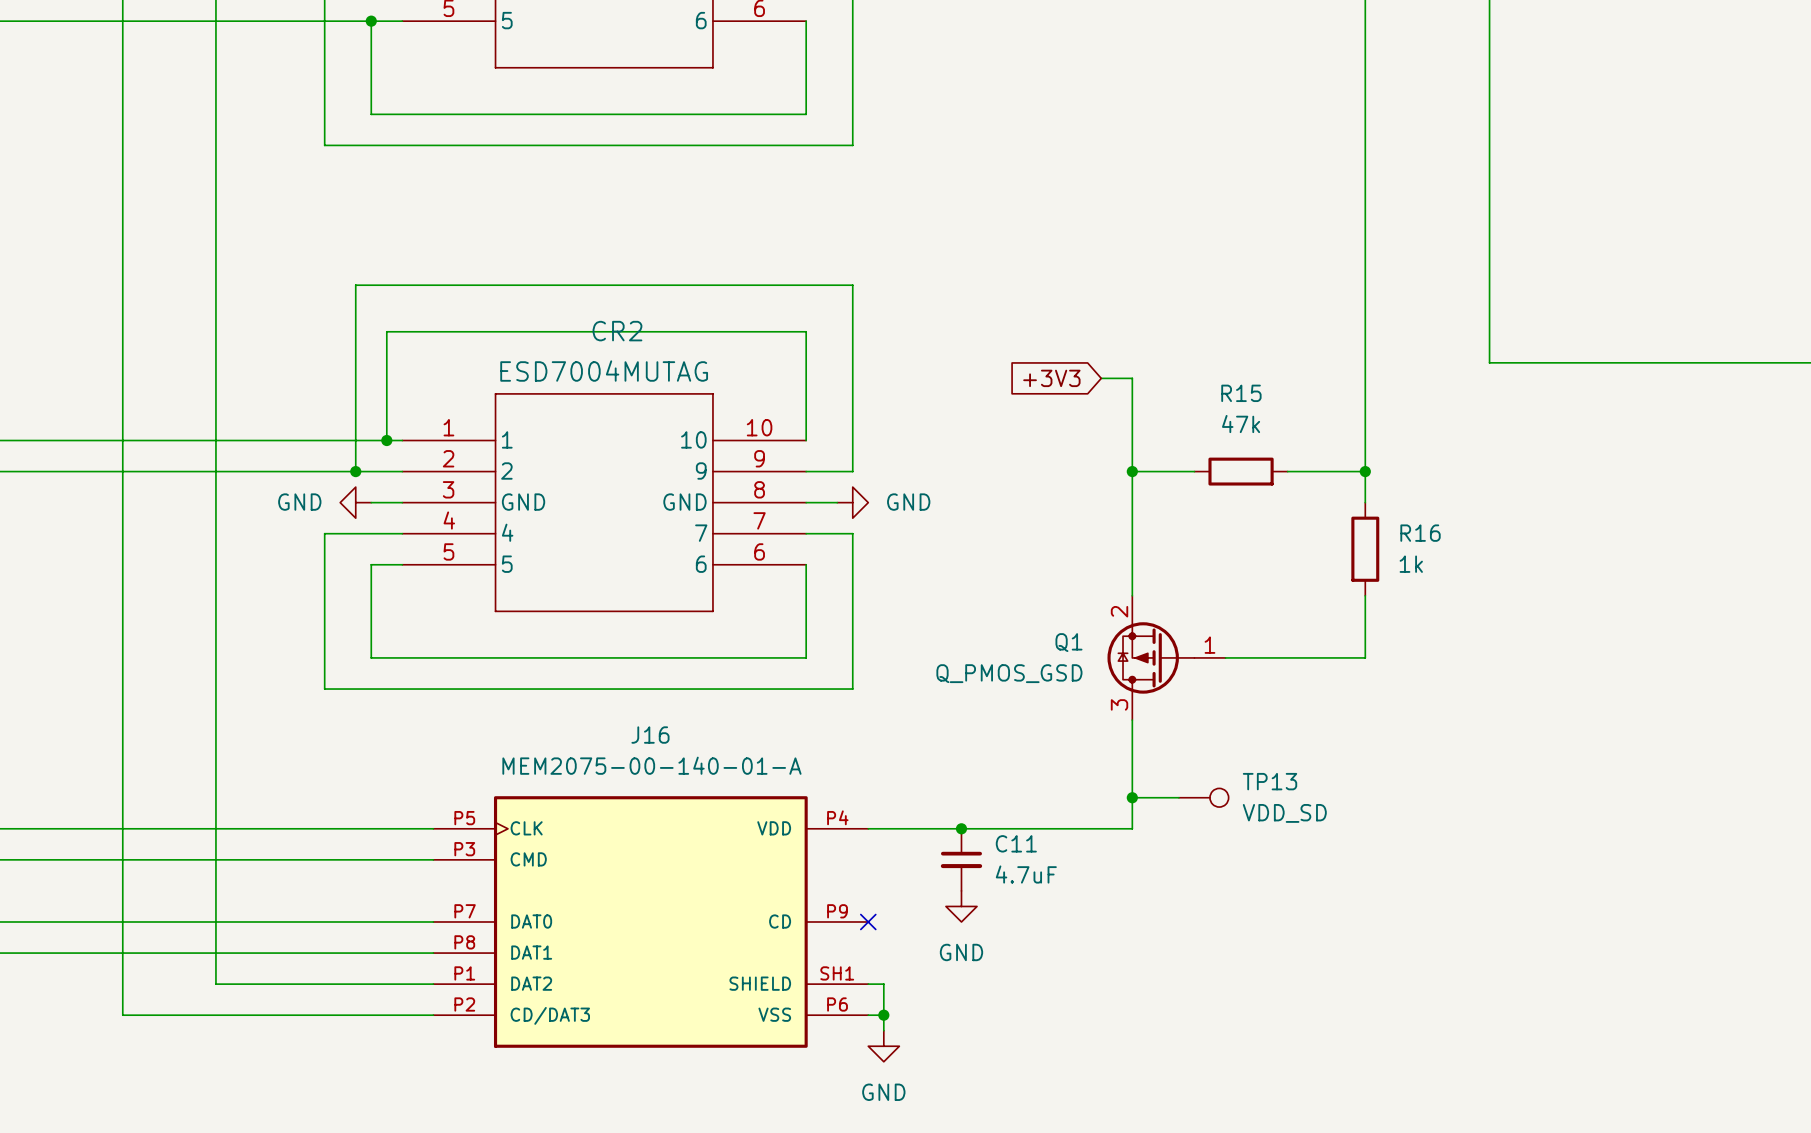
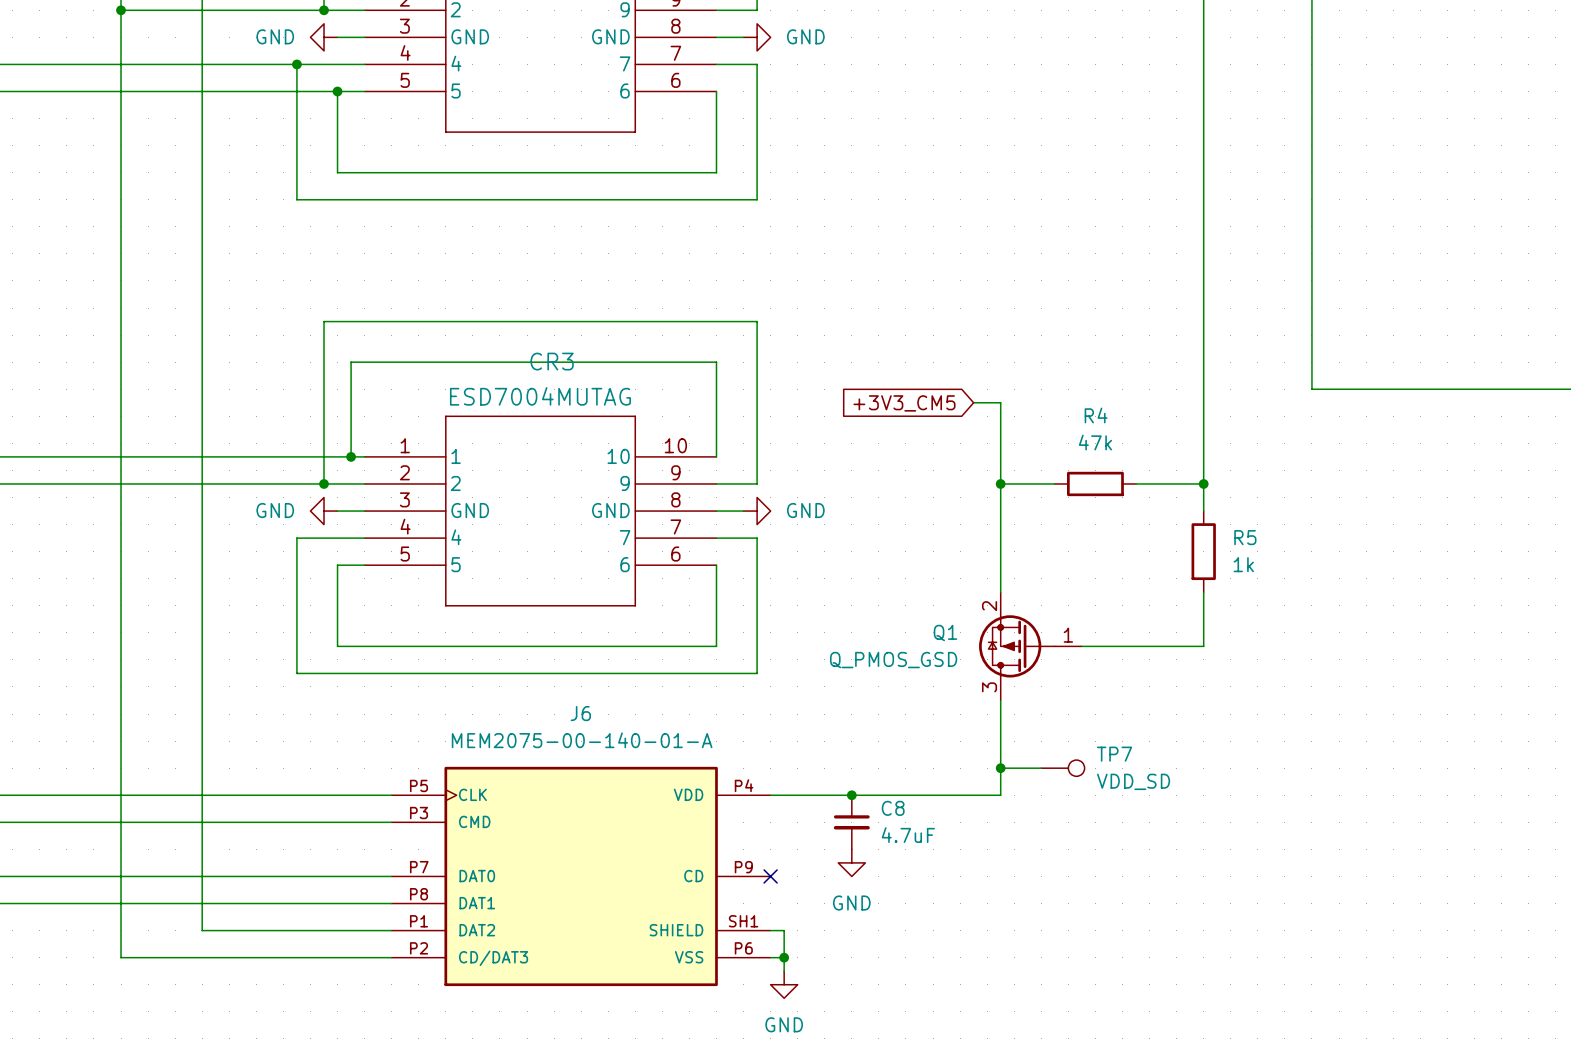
CR2 name: CR2 (617, 331) -> CR3 (552, 361)
global label: +3V3 (1051, 378) -> +3V3_CM5 (904, 403)
R15 name: R15 (1241, 393) -> R4 (1096, 415)
R16 name: R16 (1420, 533) -> R5 (1245, 537)
J16 name: J16 (650, 735) -> J6 (580, 713)
TP13 name: TP13 (1270, 781) -> TP7 (1114, 754)
C11 name: C11 (1016, 843) -> C8 (893, 808)

